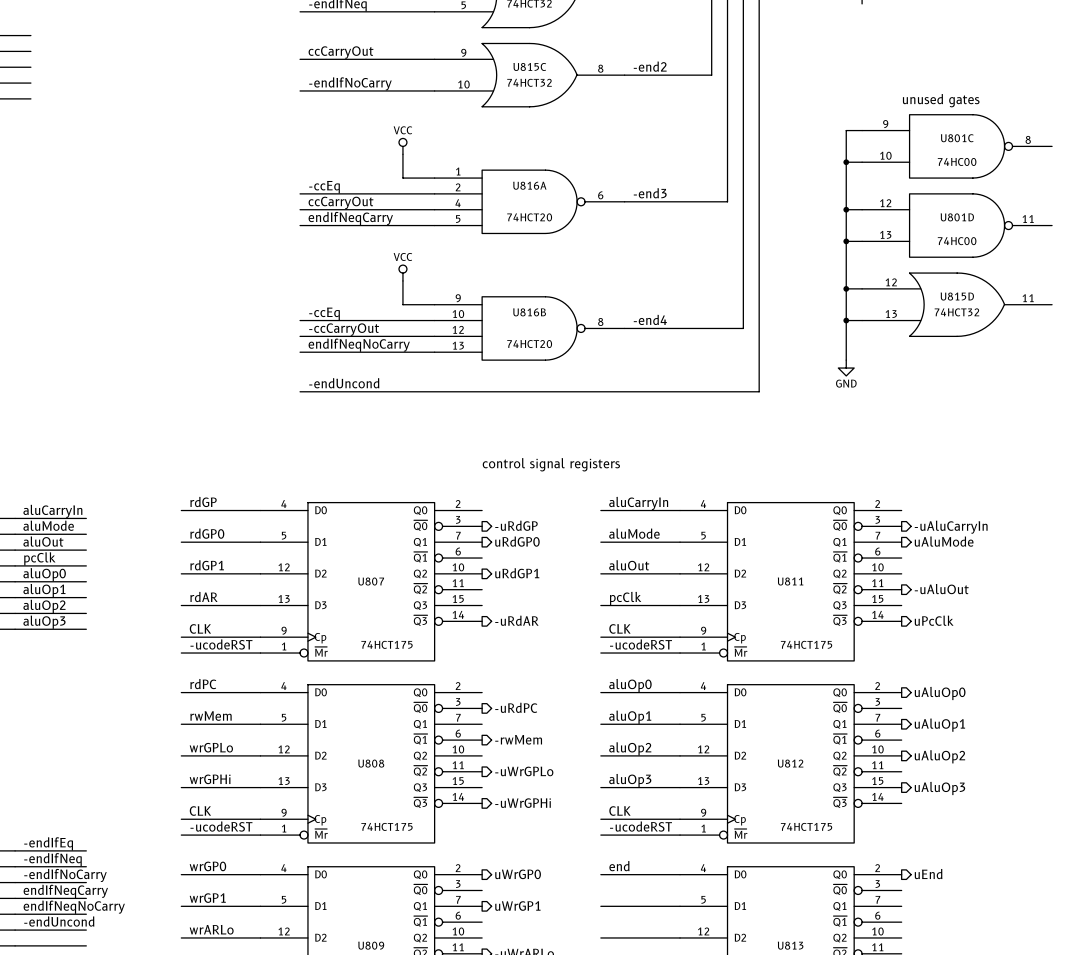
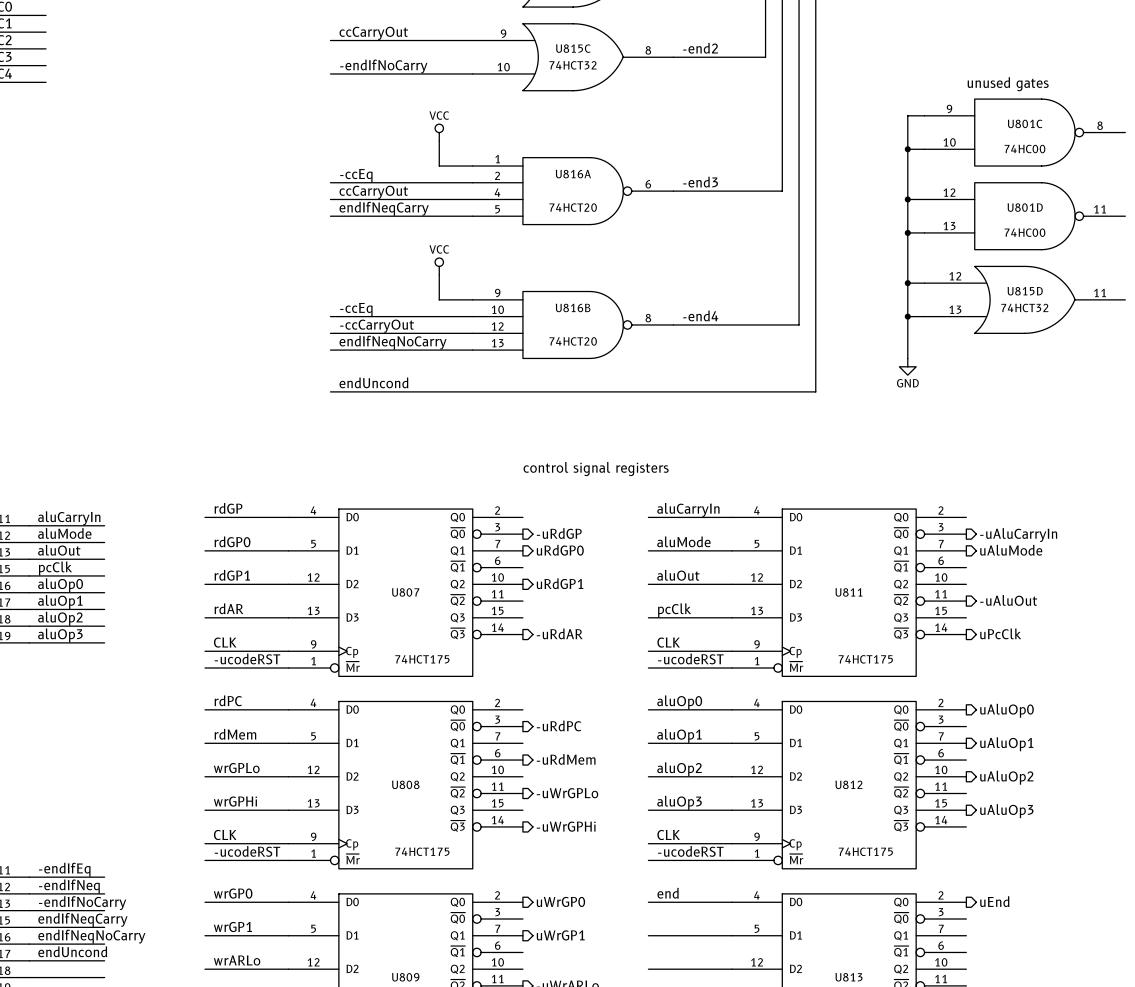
label: -endUncond (344, 383) -> endUncond (373, 382)
label: rwMem (211, 716) -> rdMem (235, 734)
hierarchical label: -rwMem (518, 739) -> -uRdMem (566, 759)
label: -endUncond (59, 921) -> endUncond (72, 951)

